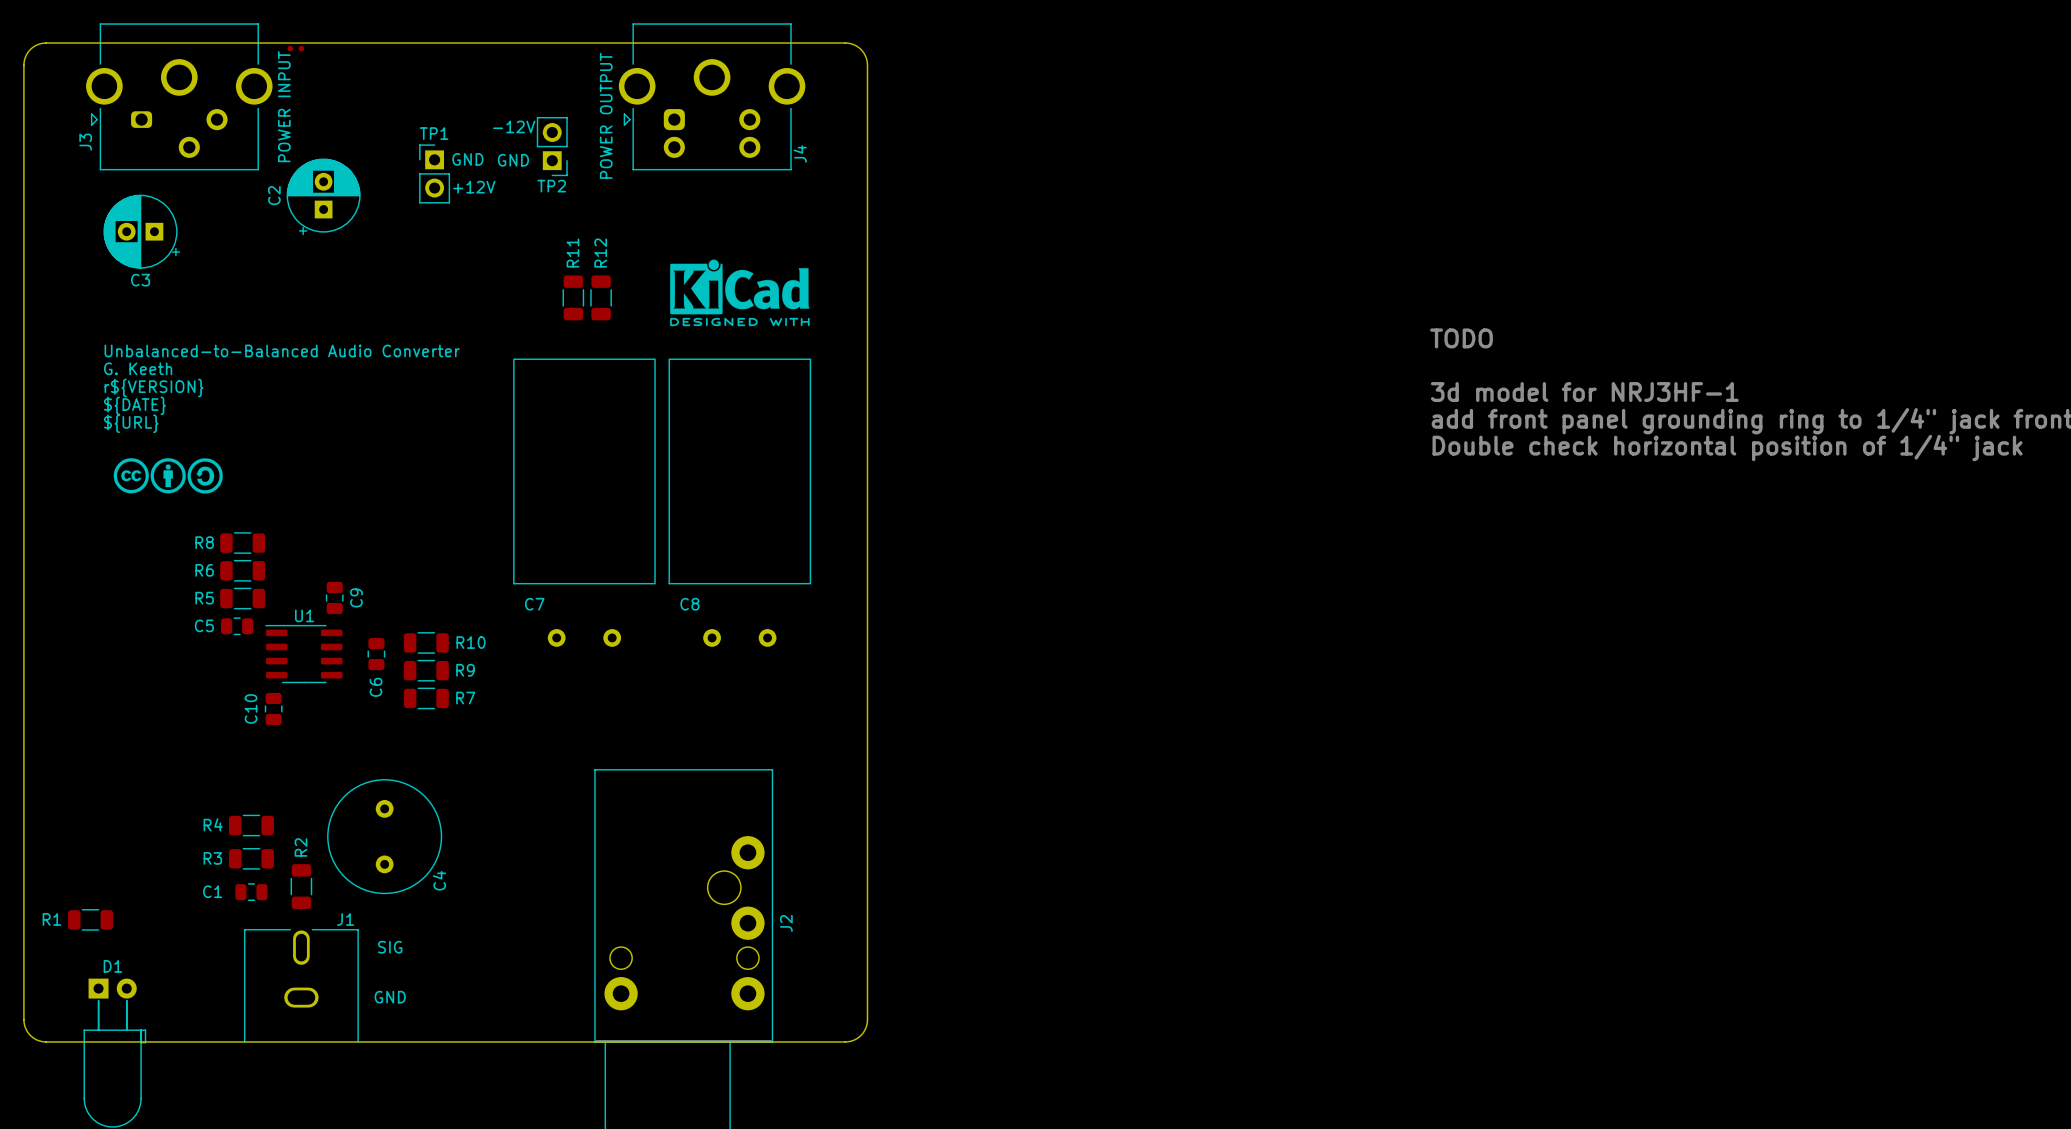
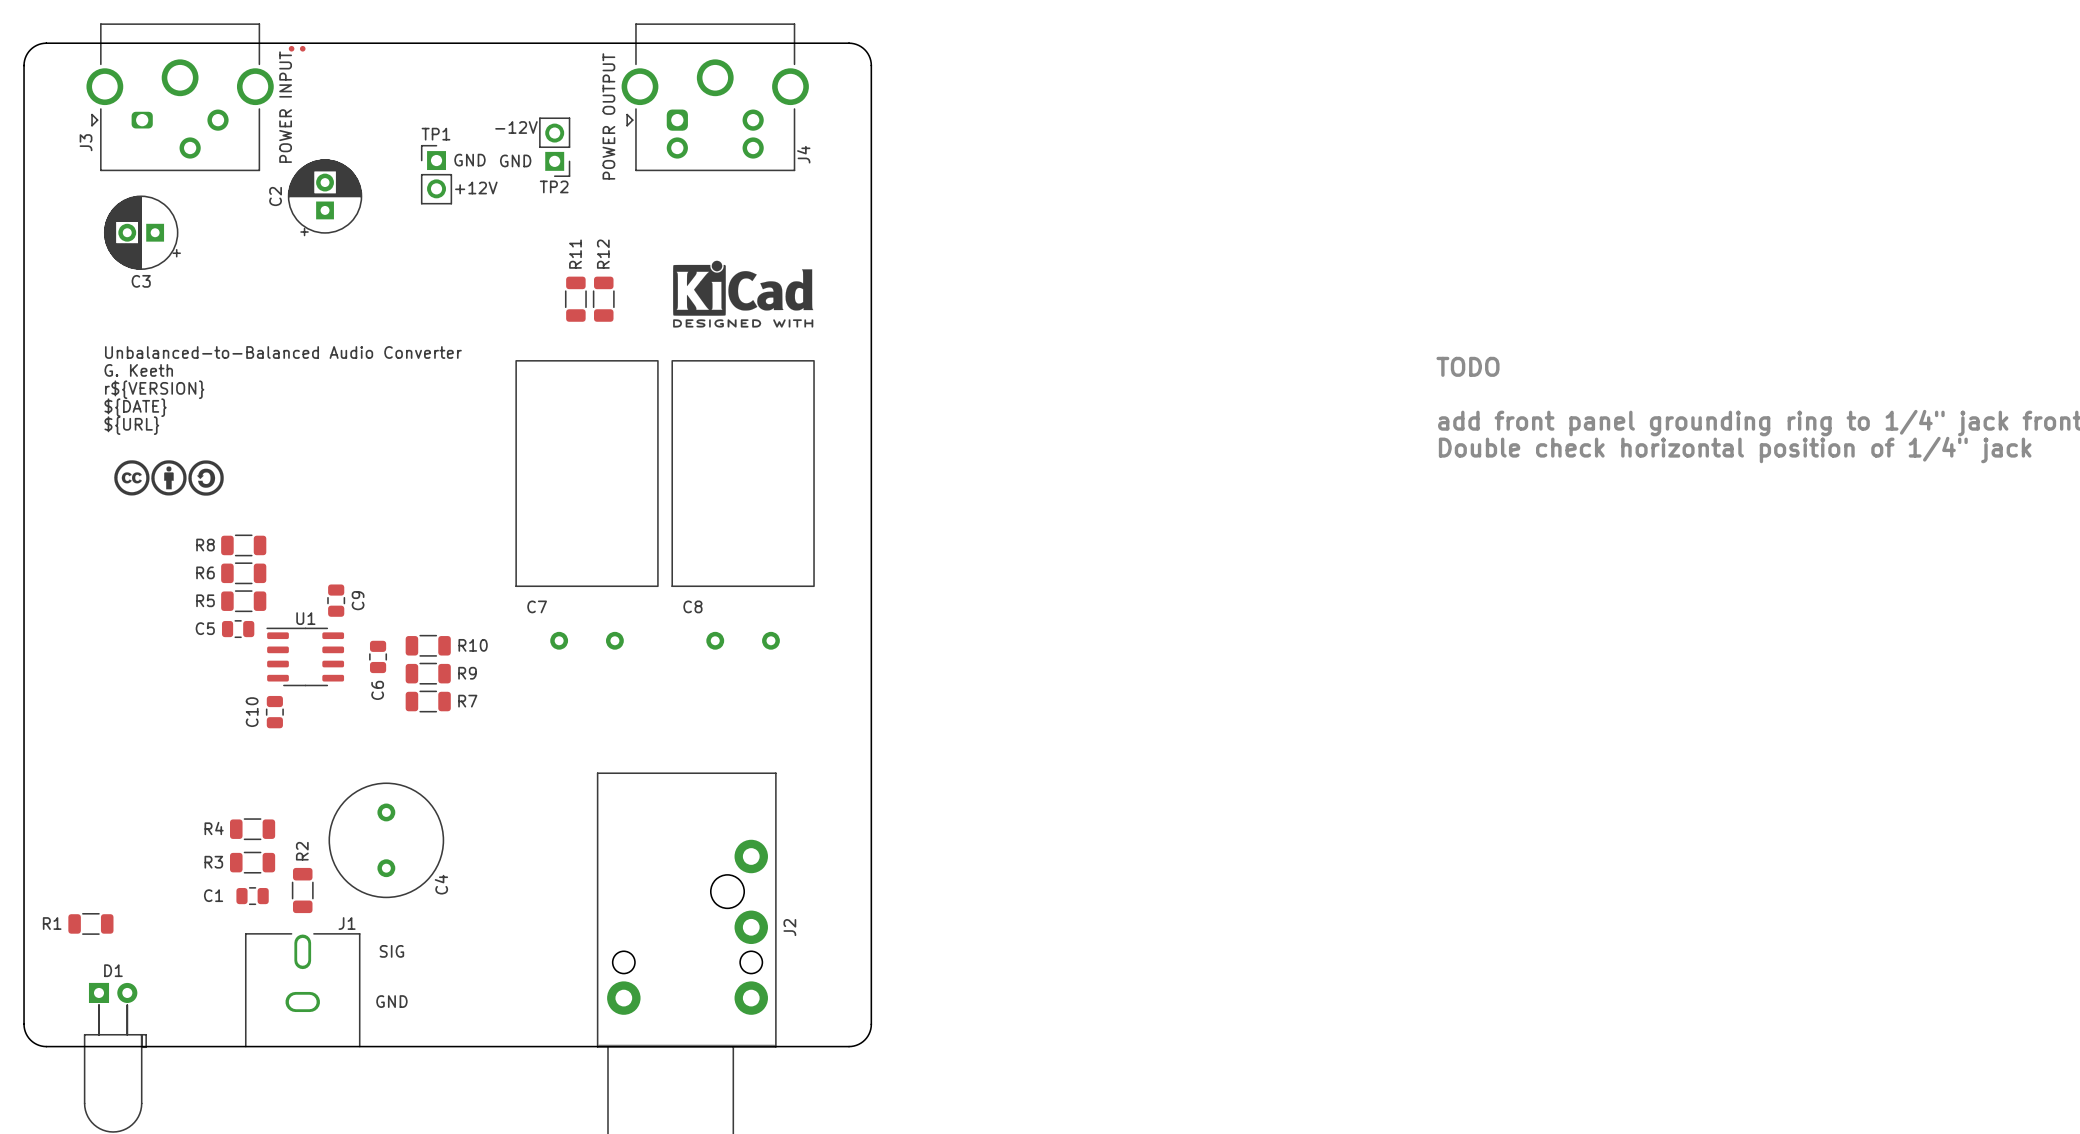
text position: TODO (1461, 338) -> TODO (1467, 366)
text: 3d model for NRJ3HF-1 (1584, 392) -> none

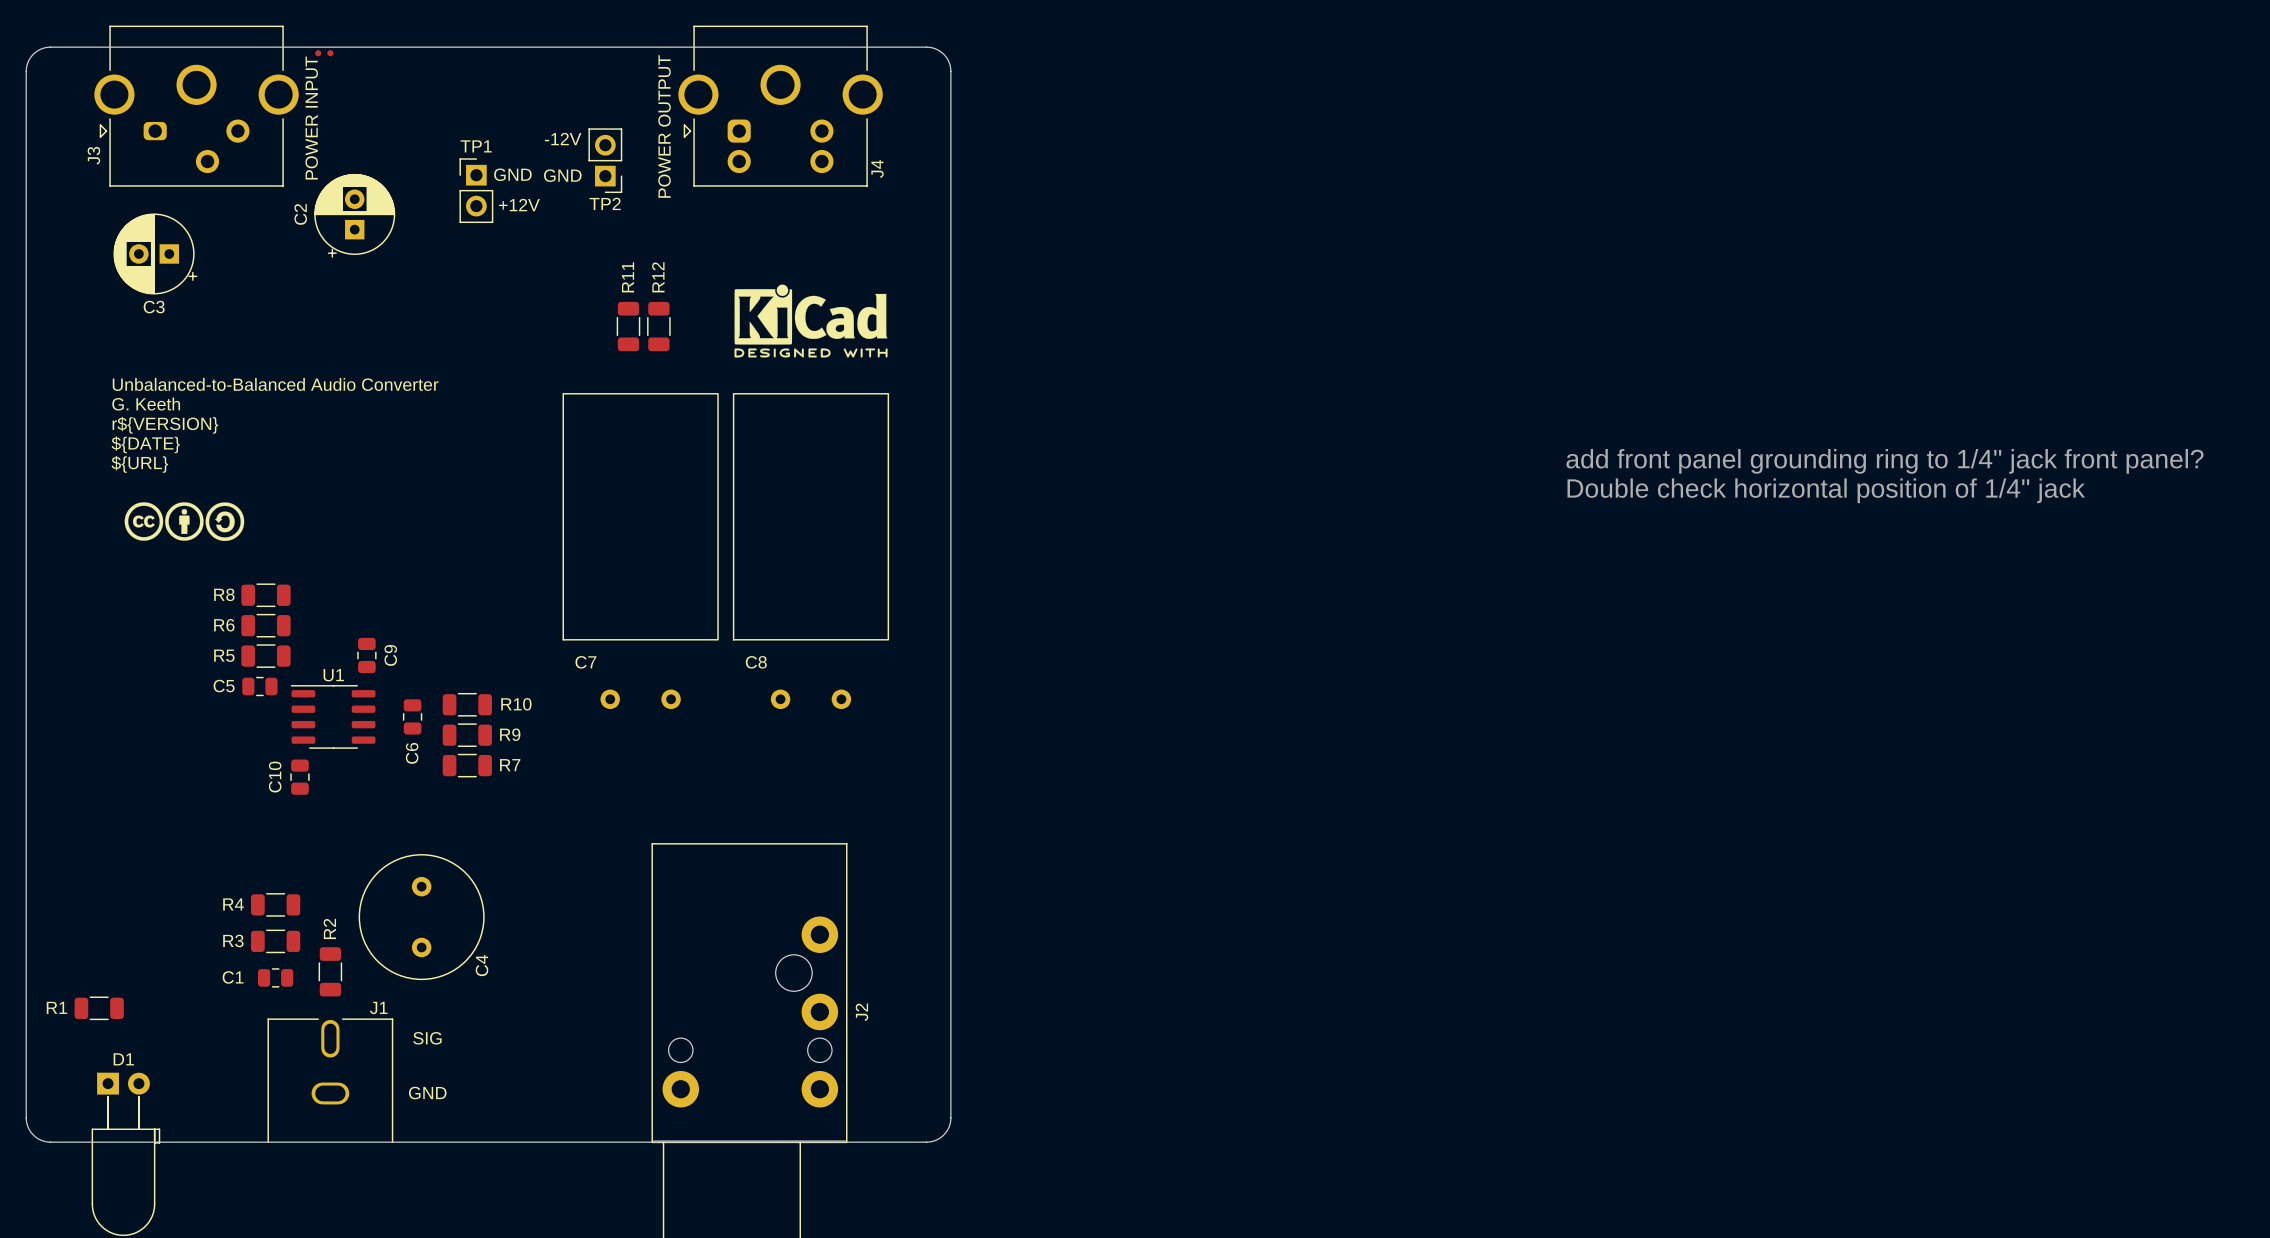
text: TODO (1467, 366) -> none

